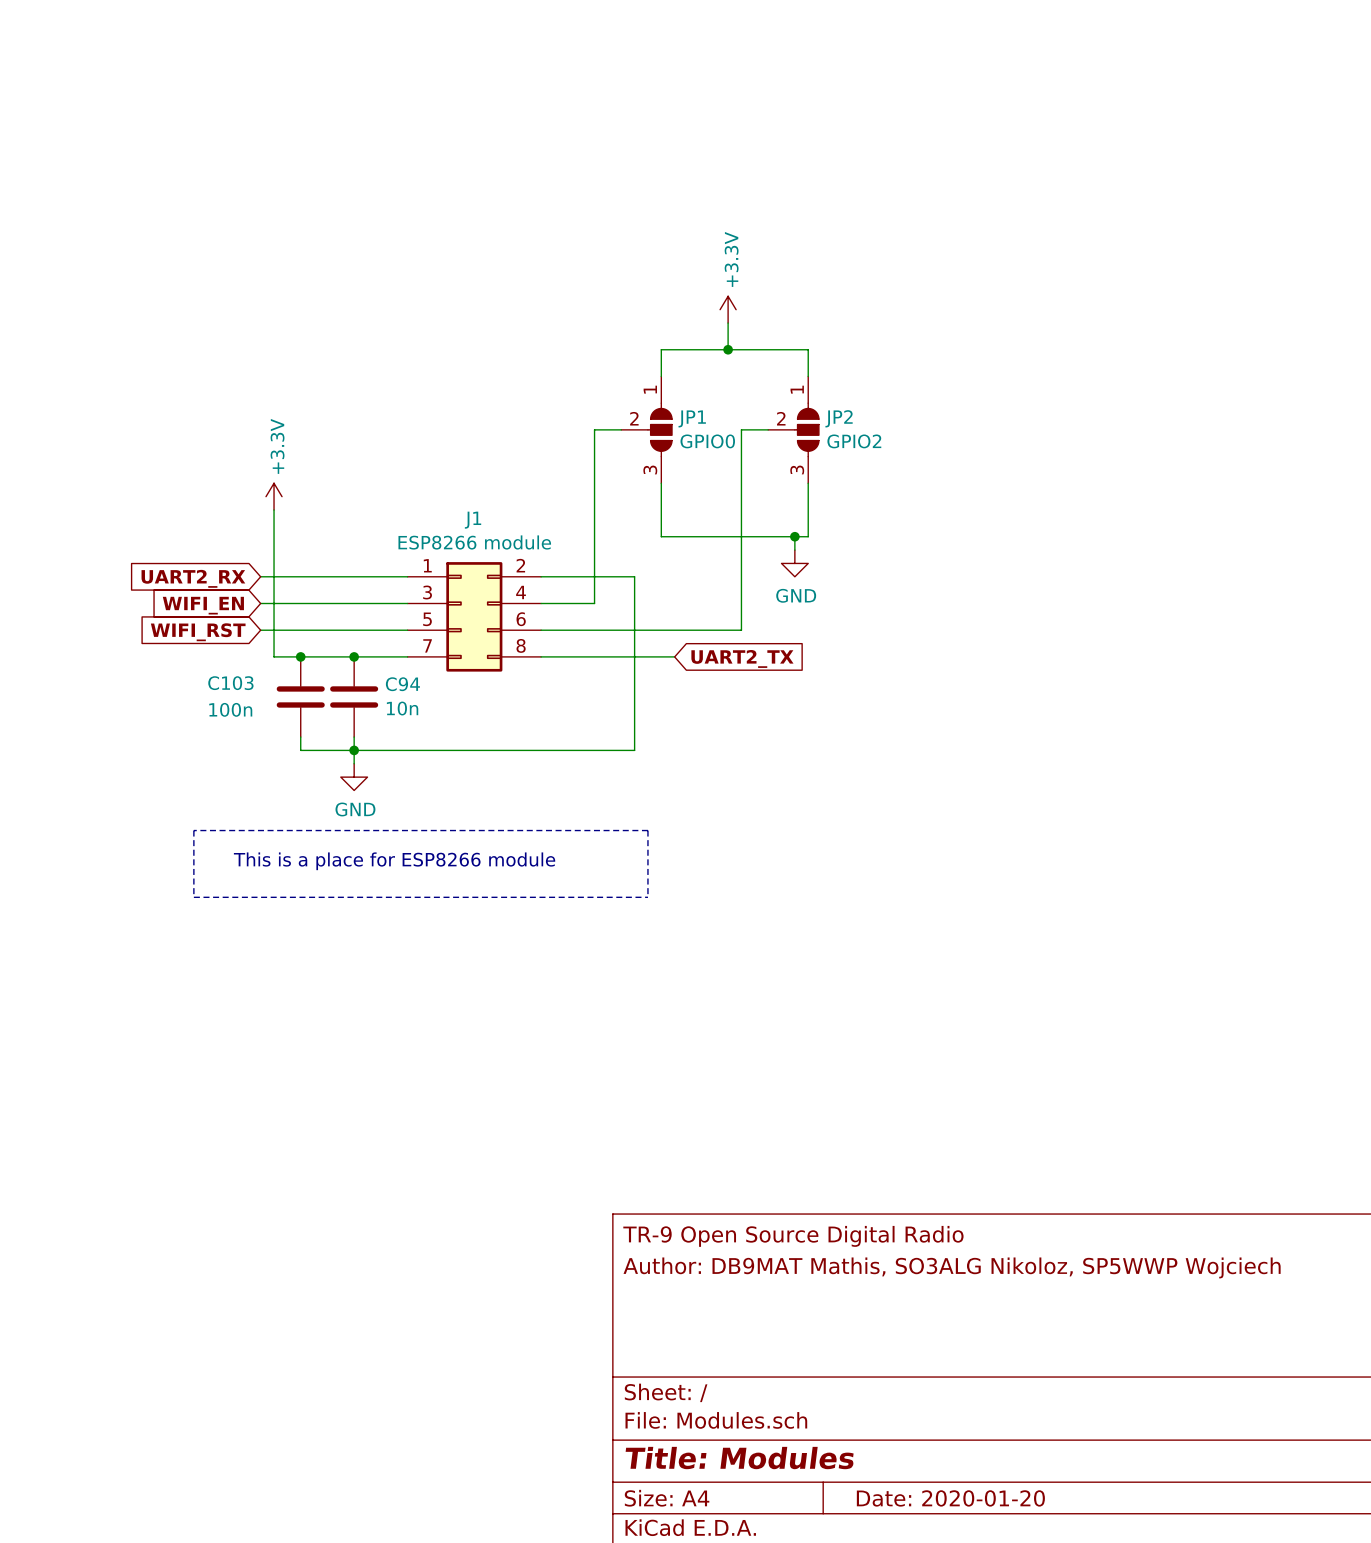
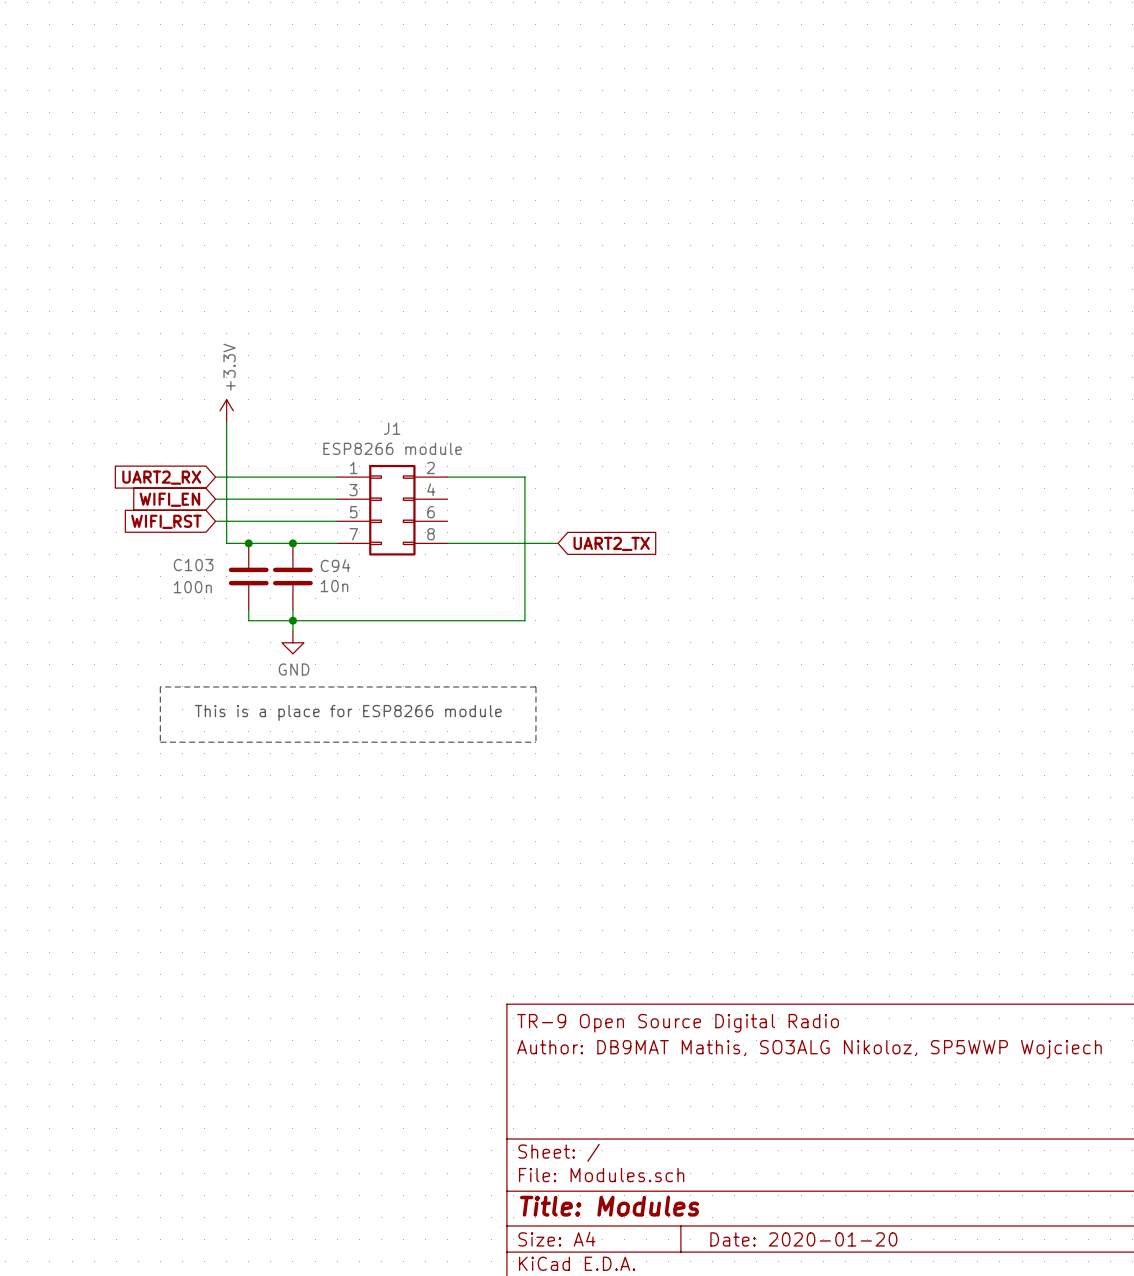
power symbol: +3.3V (728, 309) -> none
wire: (728, 323) (728, 349) -> none
junction: (728, 349) -> none
wire: (661, 376) (661, 349) (808, 349) (808, 376) -> none
wire: (621, 429) (594, 429) (594, 603) (541, 603) -> none
JP1: GPIO0 (646, 429) -> none
wire: (768, 429) (741, 429) (741, 630) (541, 630) -> none
JP2: GPIO2 (793, 429) -> none
wire: (661, 483) (661, 536) (808, 536) (808, 483) -> none
wire: (794, 536) (794, 550) -> none
junction: (794, 536) -> none
power symbol: GND (794, 563) -> none

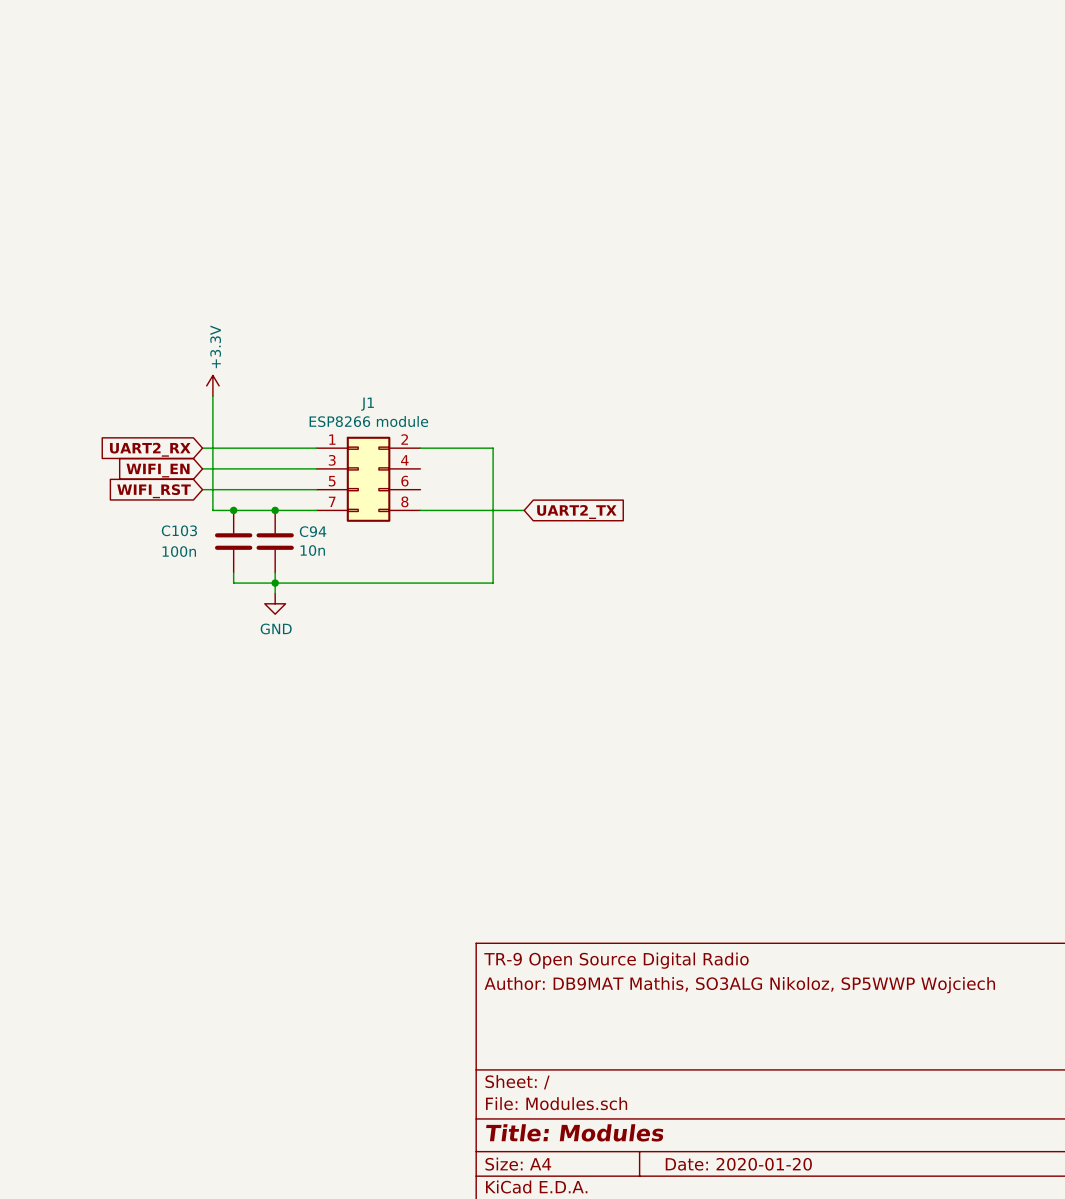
line: (160, 686) (160, 742) (535, 742) (535, 686) (160, 686) -> none
text: This is a place for ESP8266 module (348, 712) -> none

